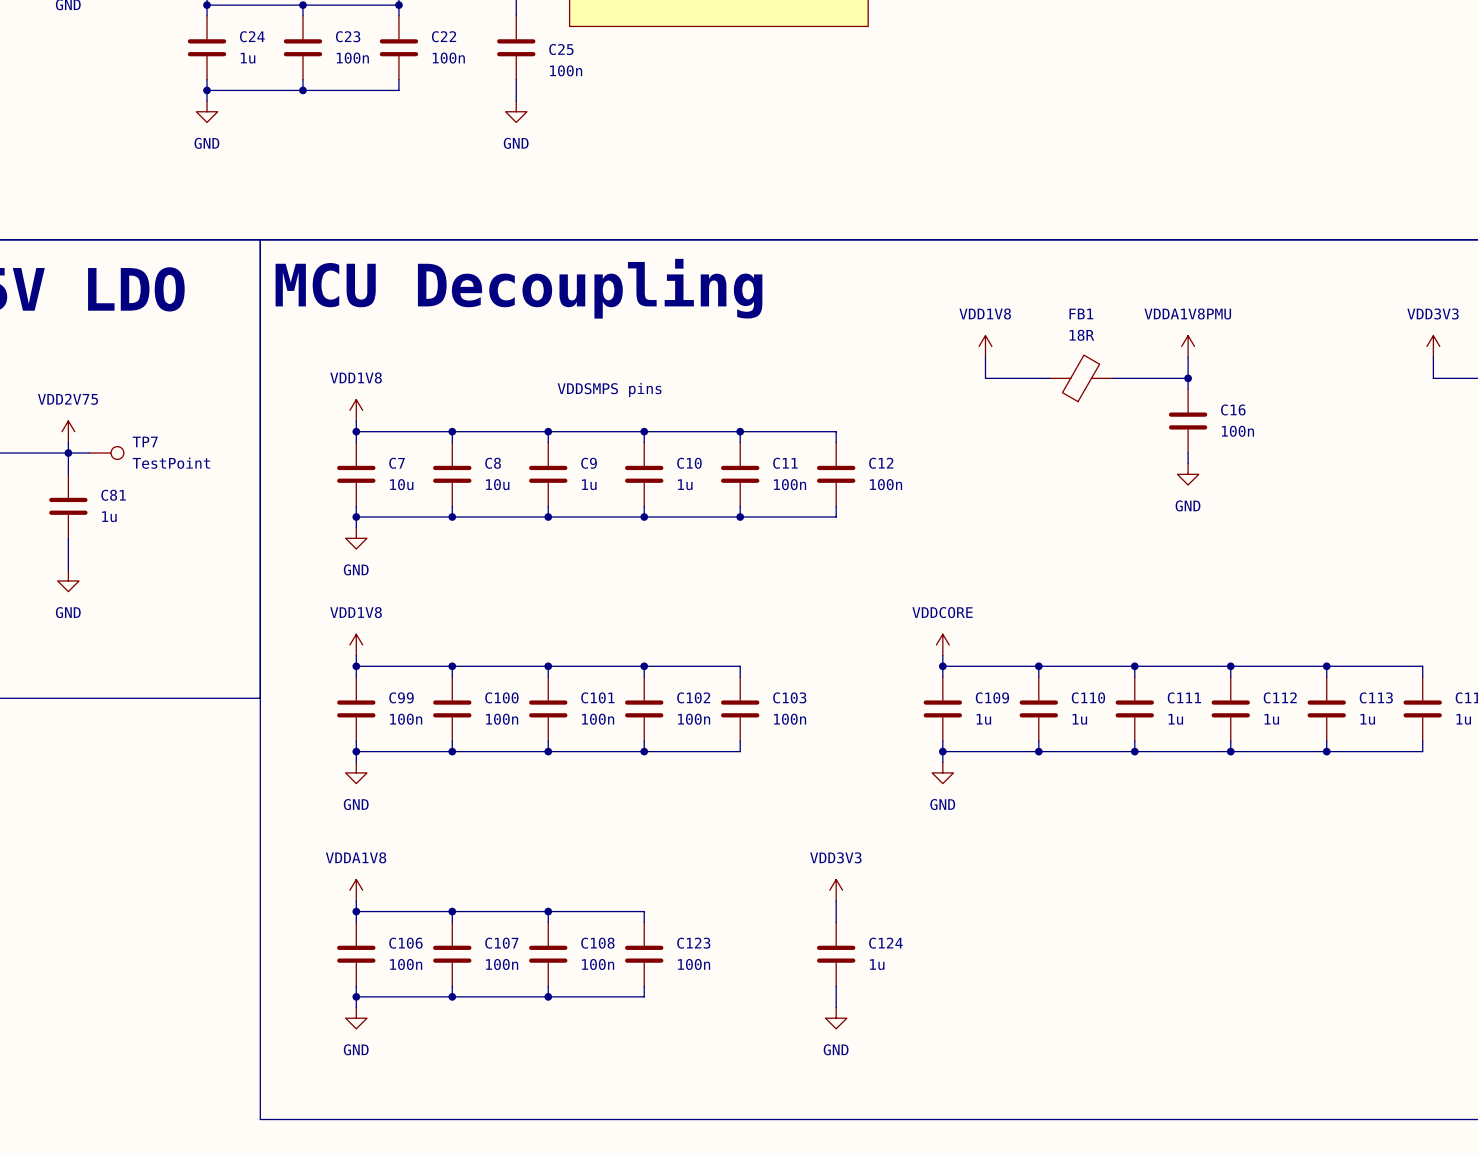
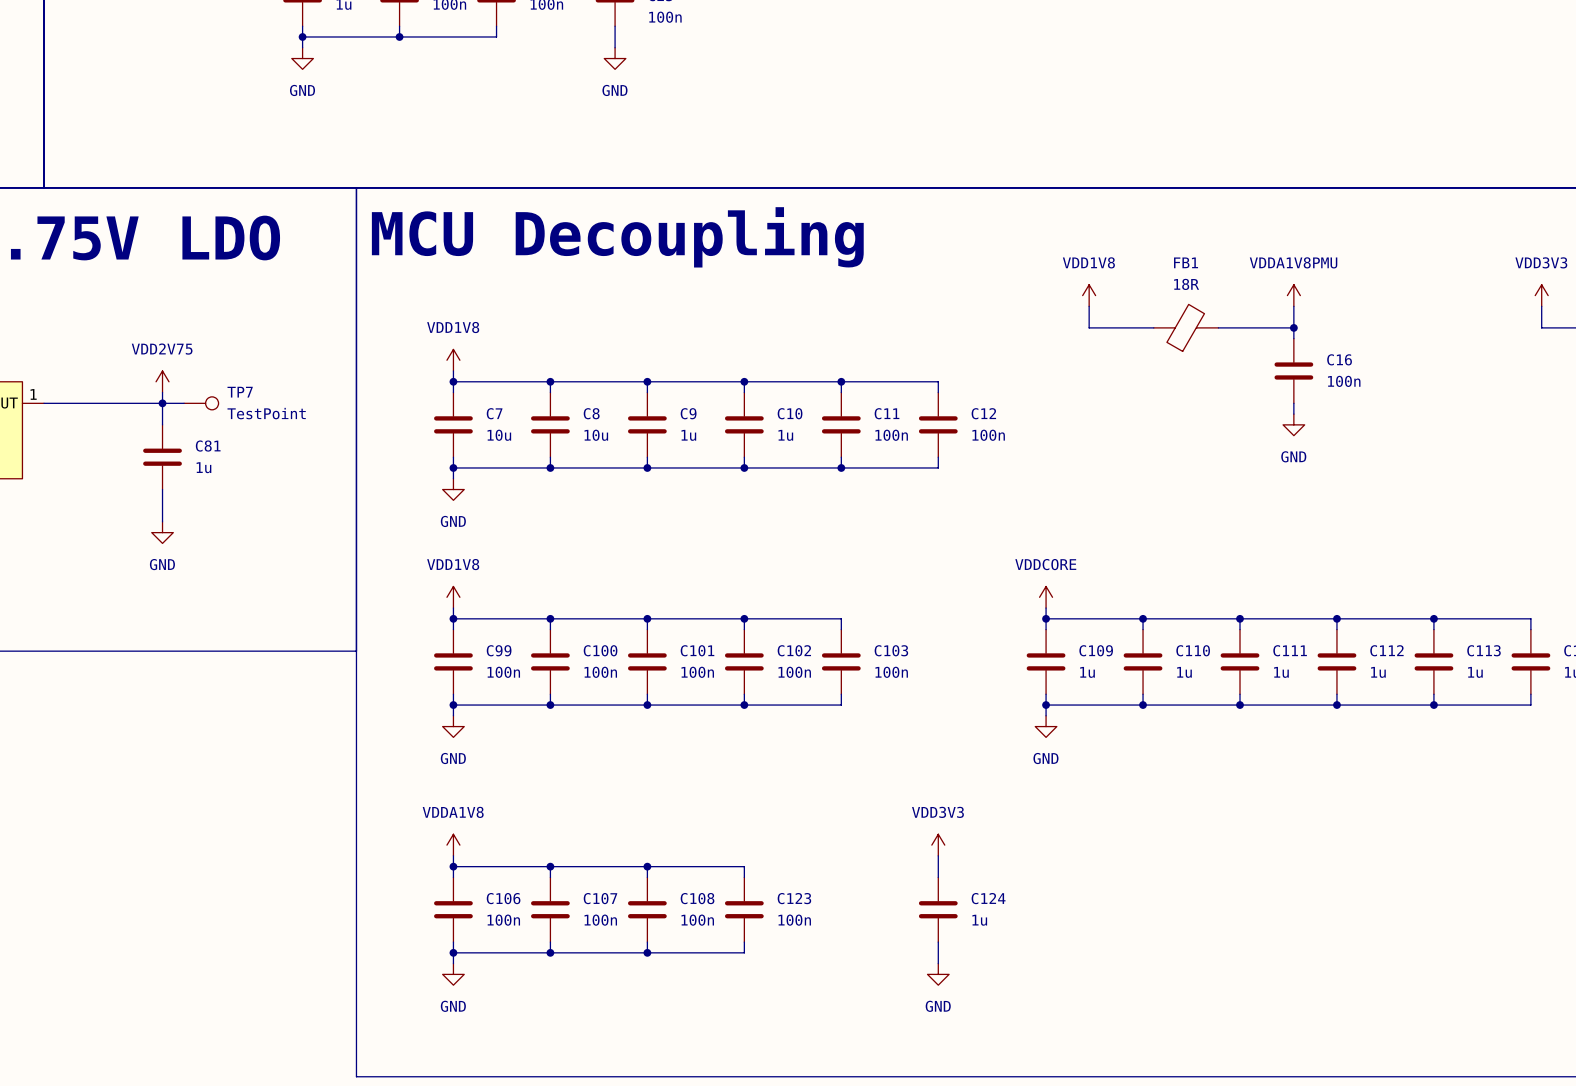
text: VDDSMPS pins (609, 389) -> none

